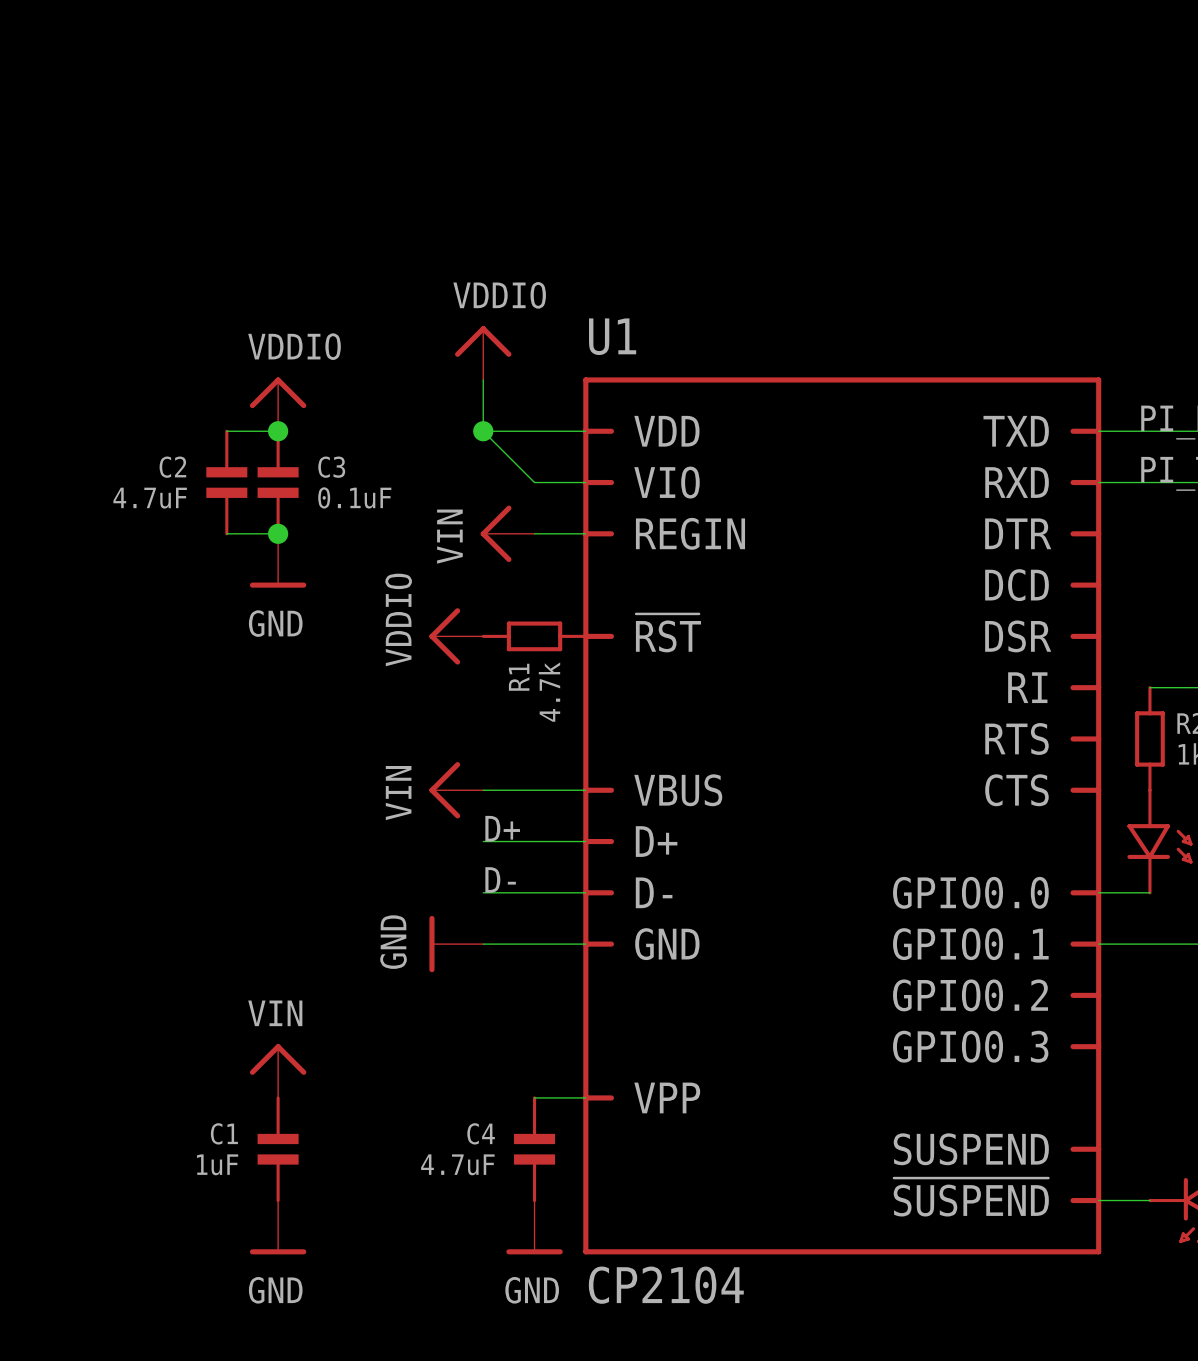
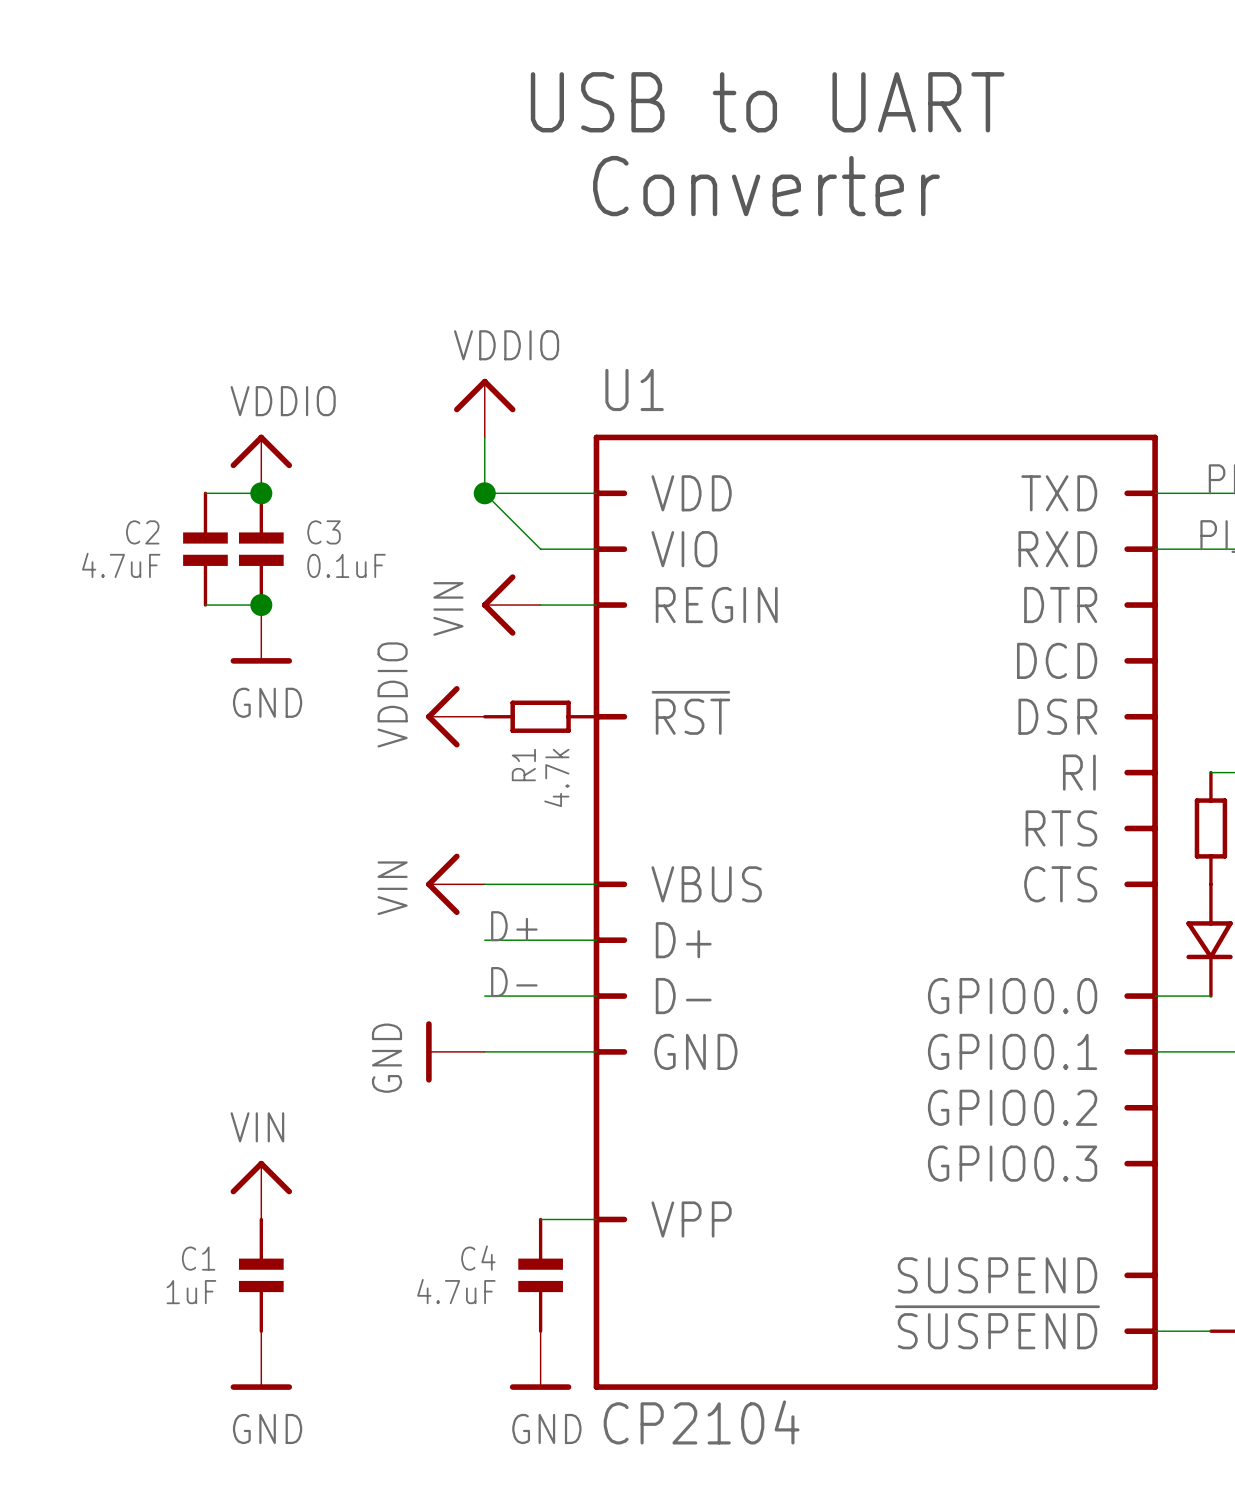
text: none -> USB to UART (767, 102)
text: none -> Converter (766, 186)

